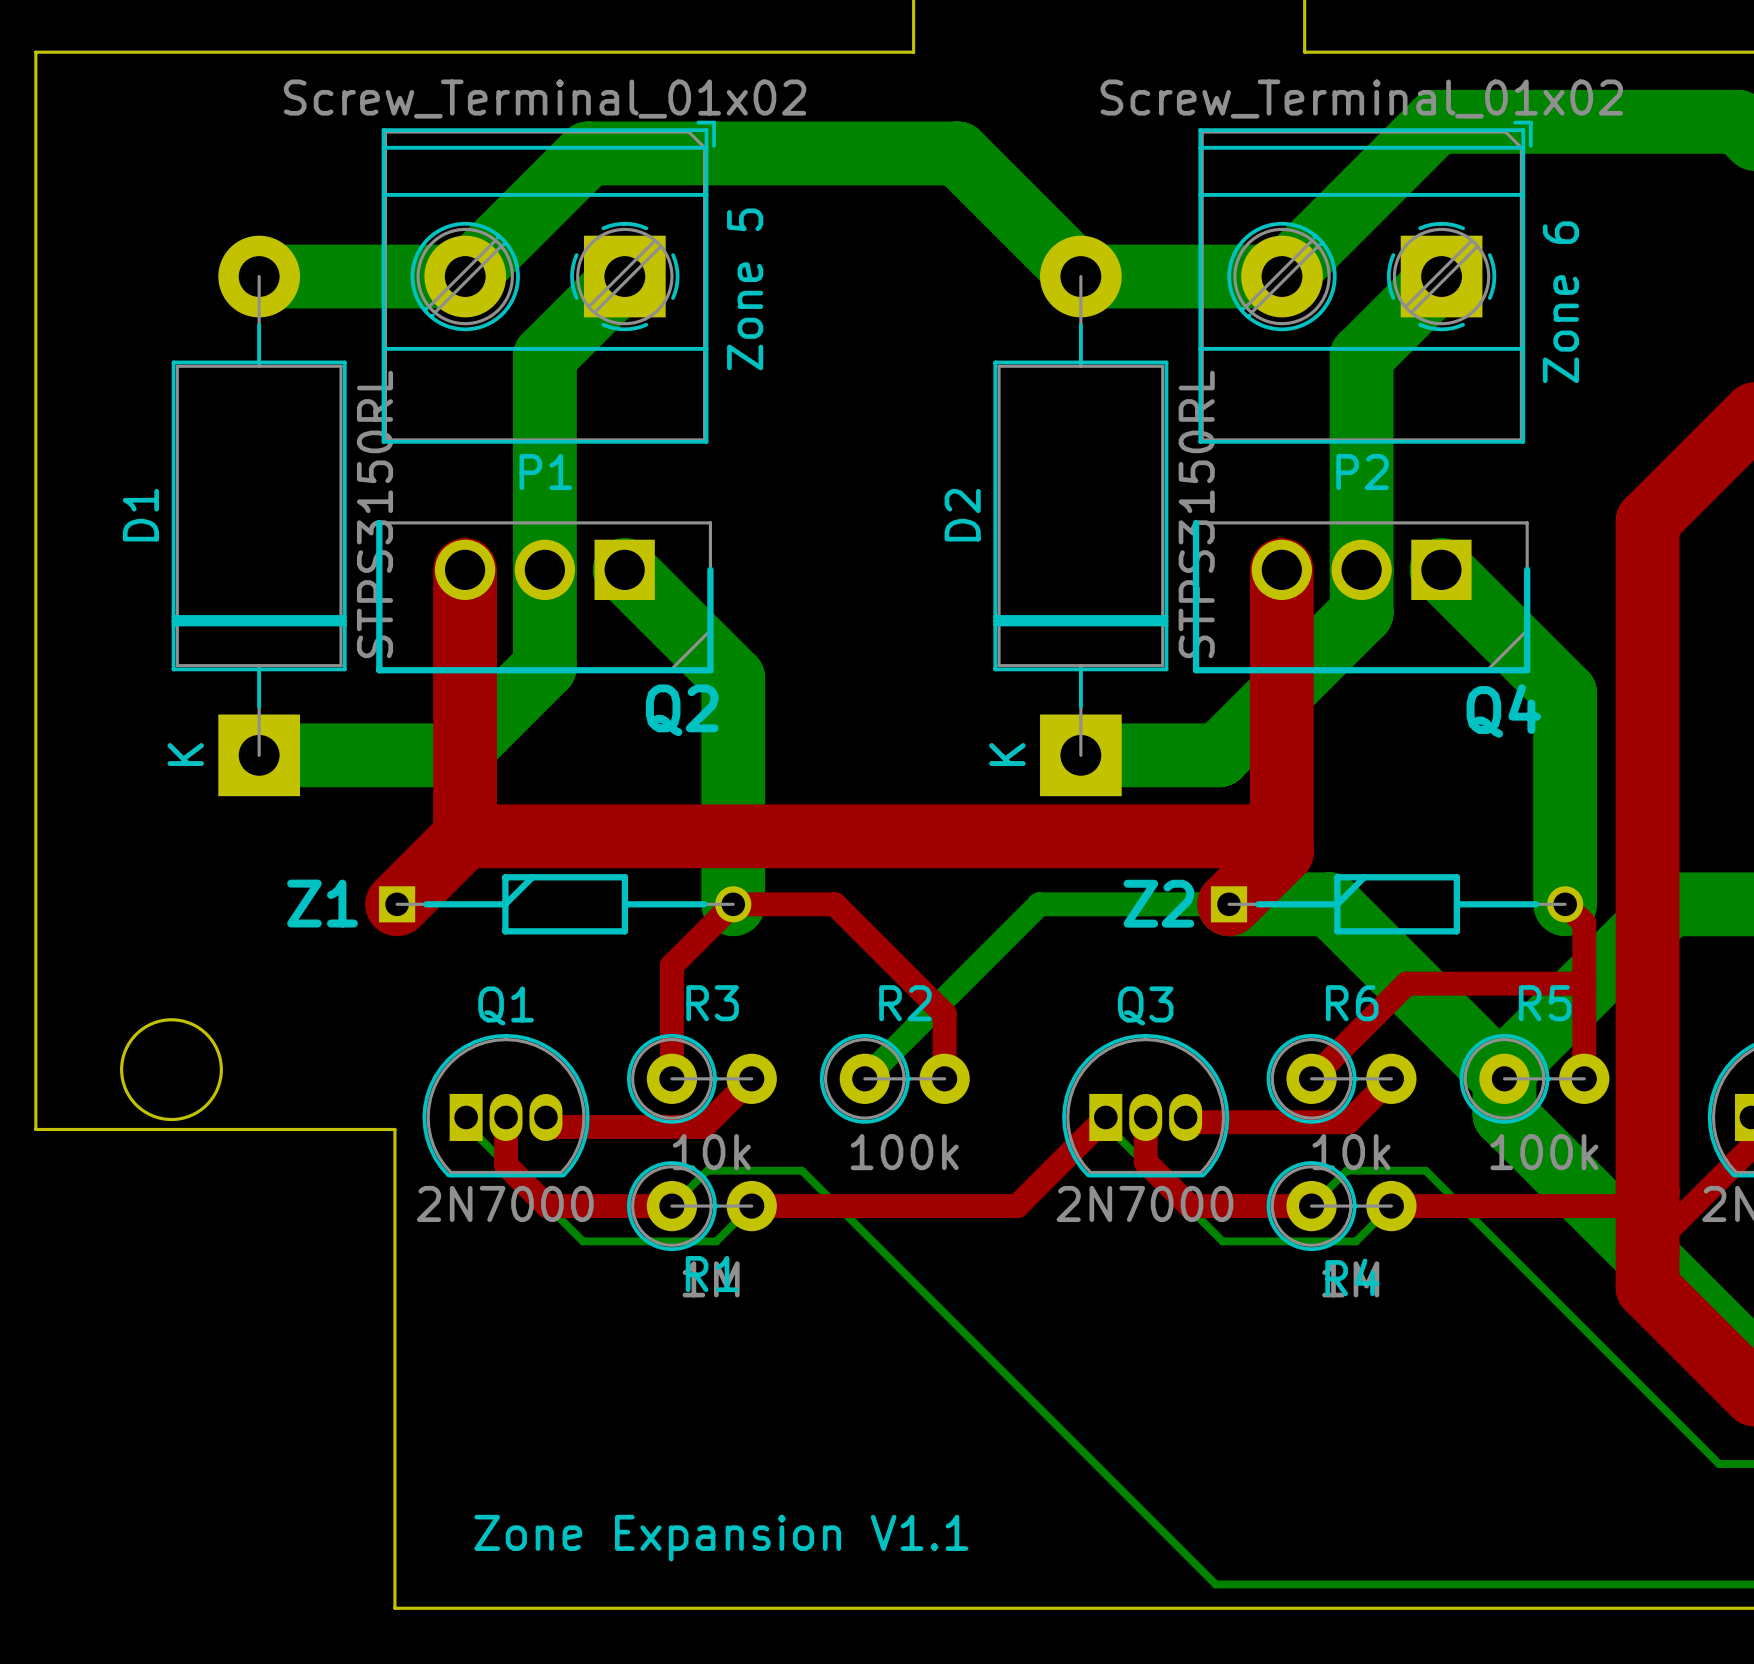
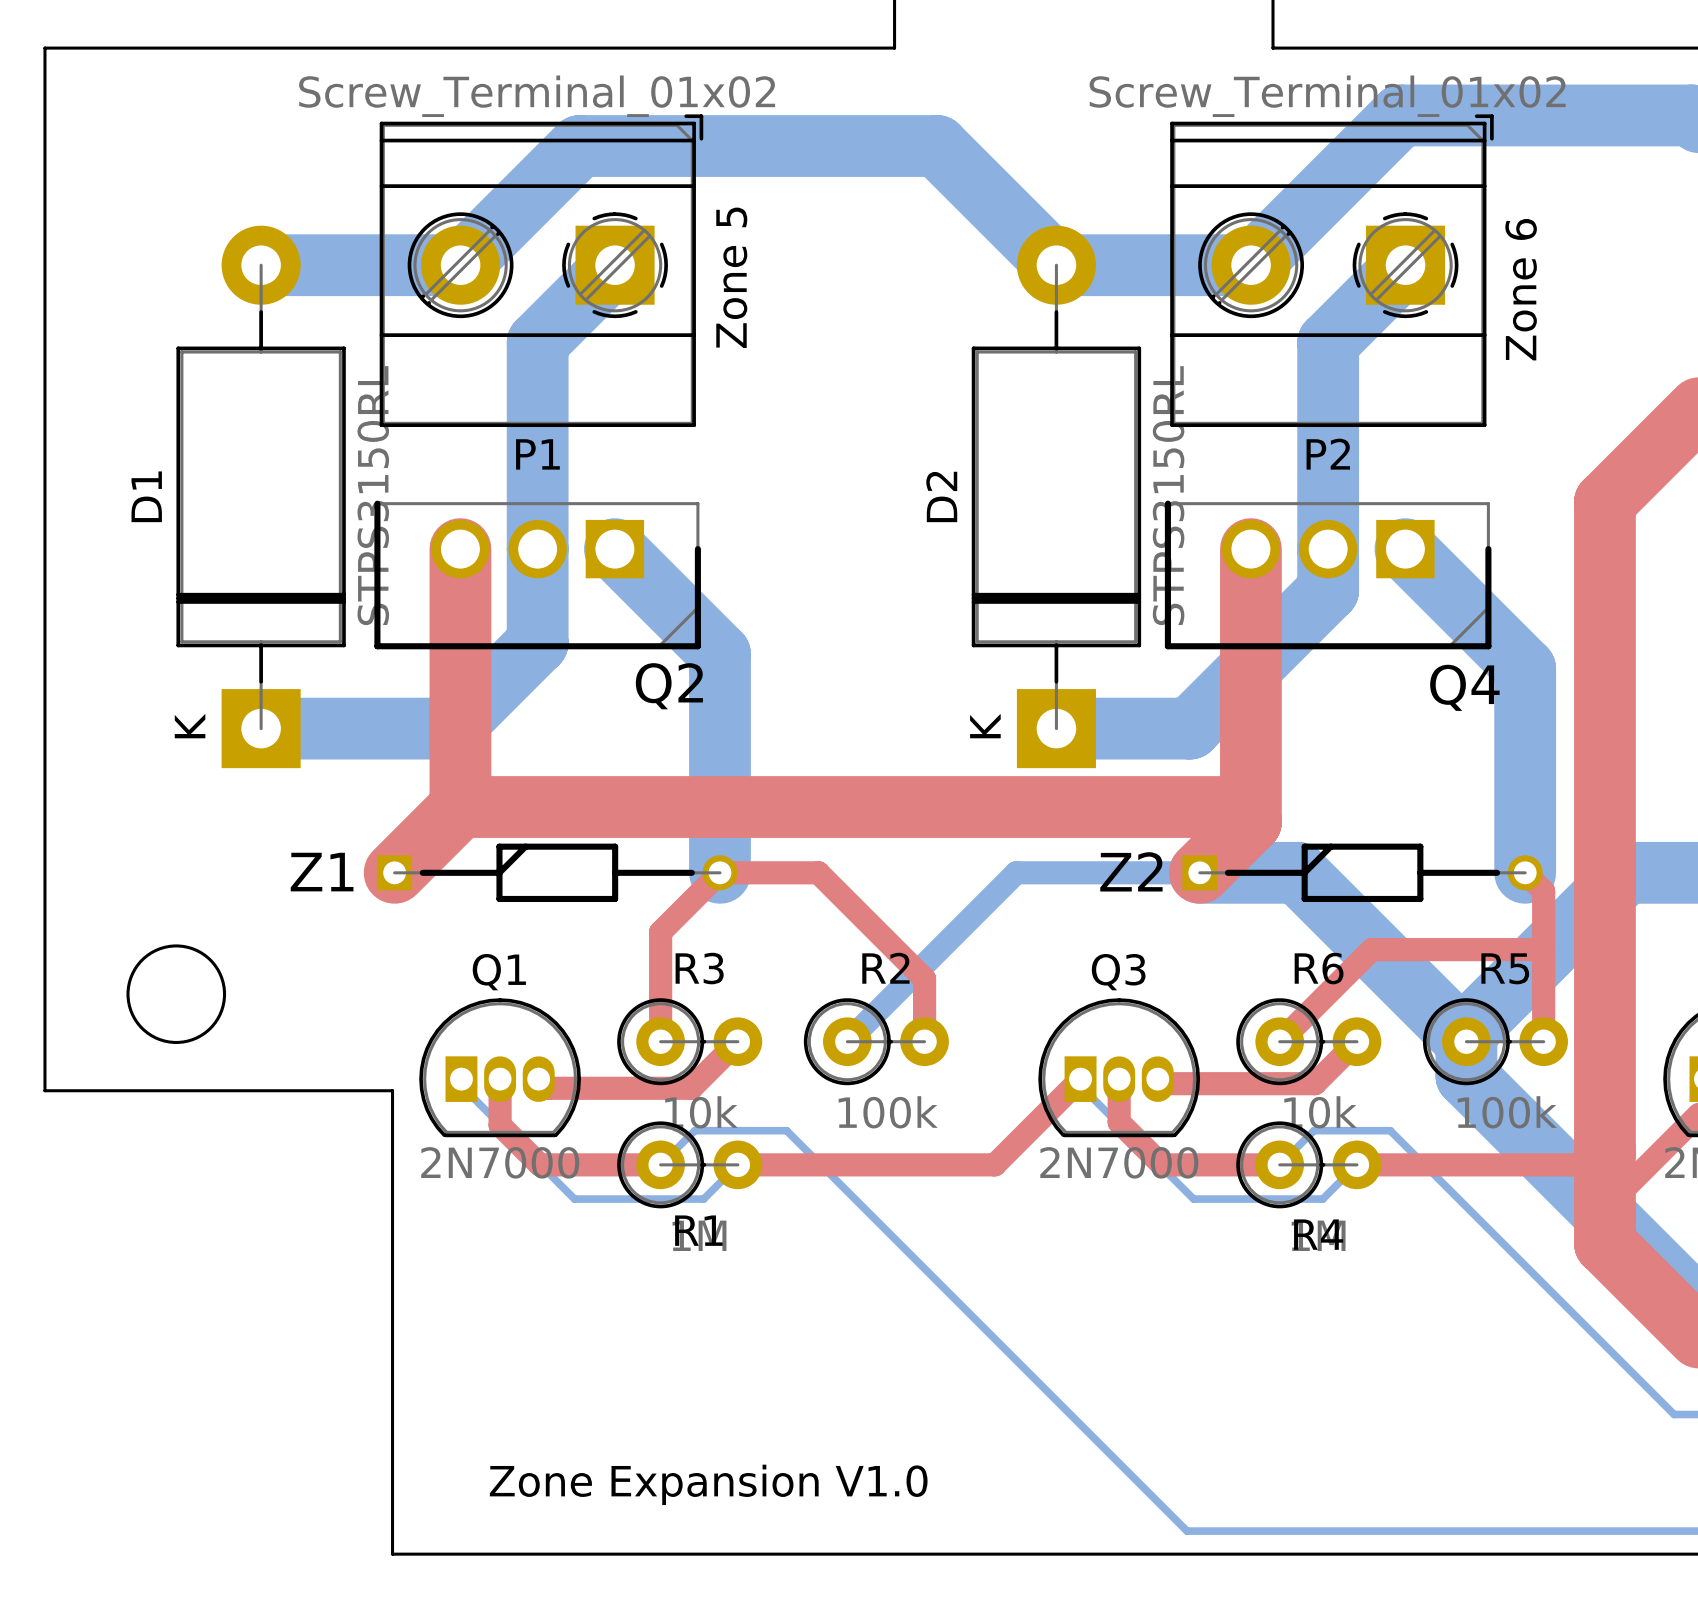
round board edge position: (171, 1069) -> (176, 994)
text: Zone Expansion V1.1 (721, 1538) -> Zone Expansion V1.0 (708, 1484)

